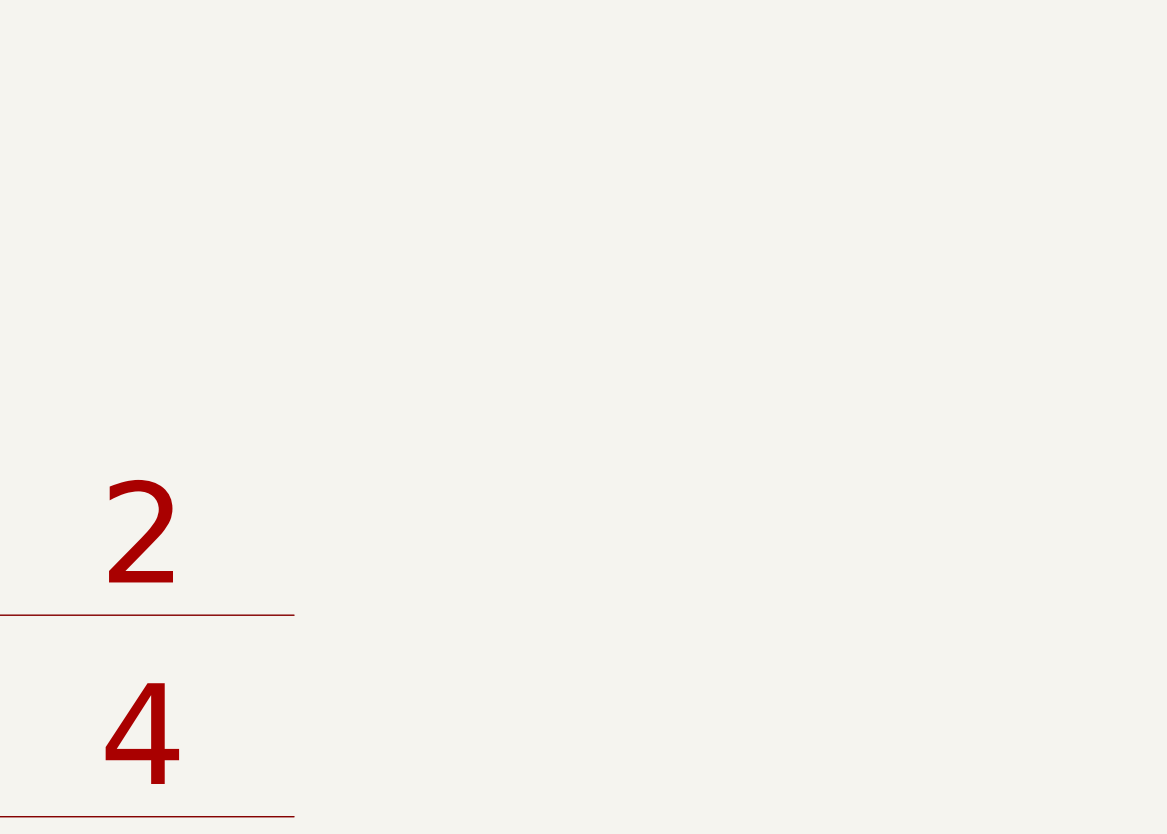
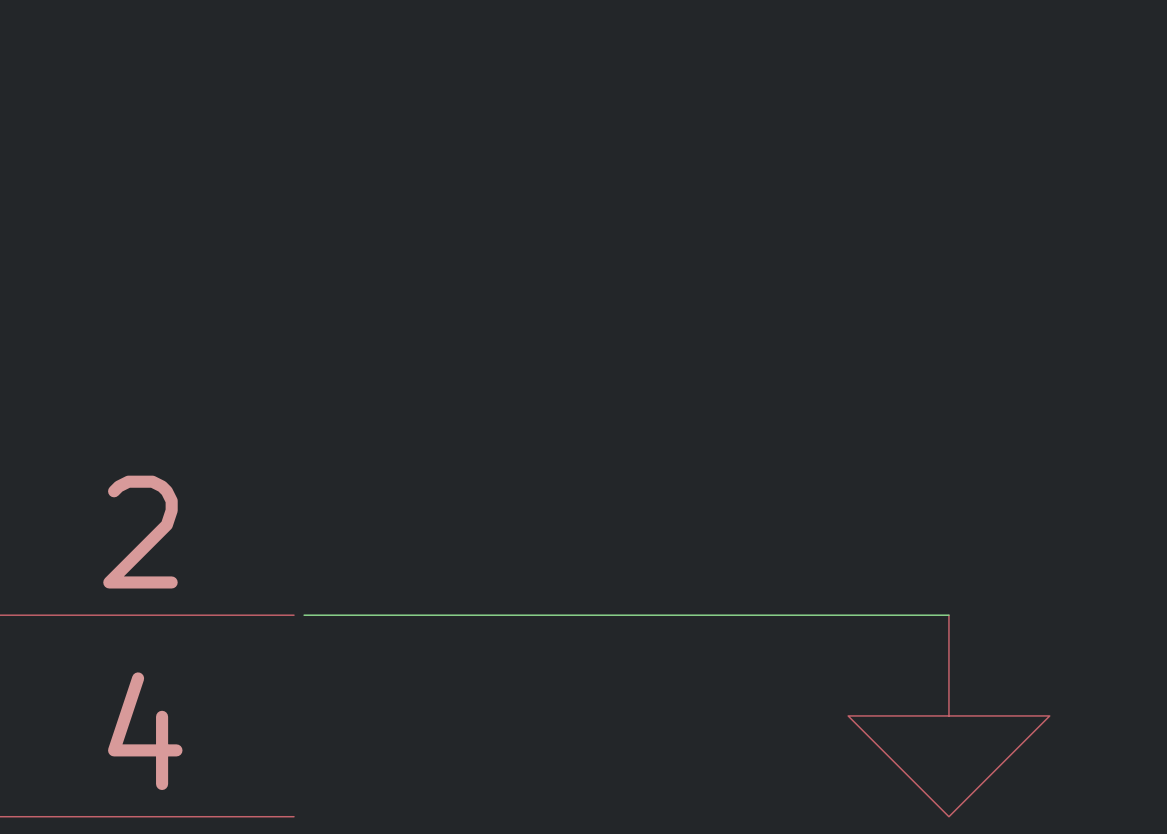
wire: none -> (304, 615) (948, 615)
power symbol: none -> (948, 715)

